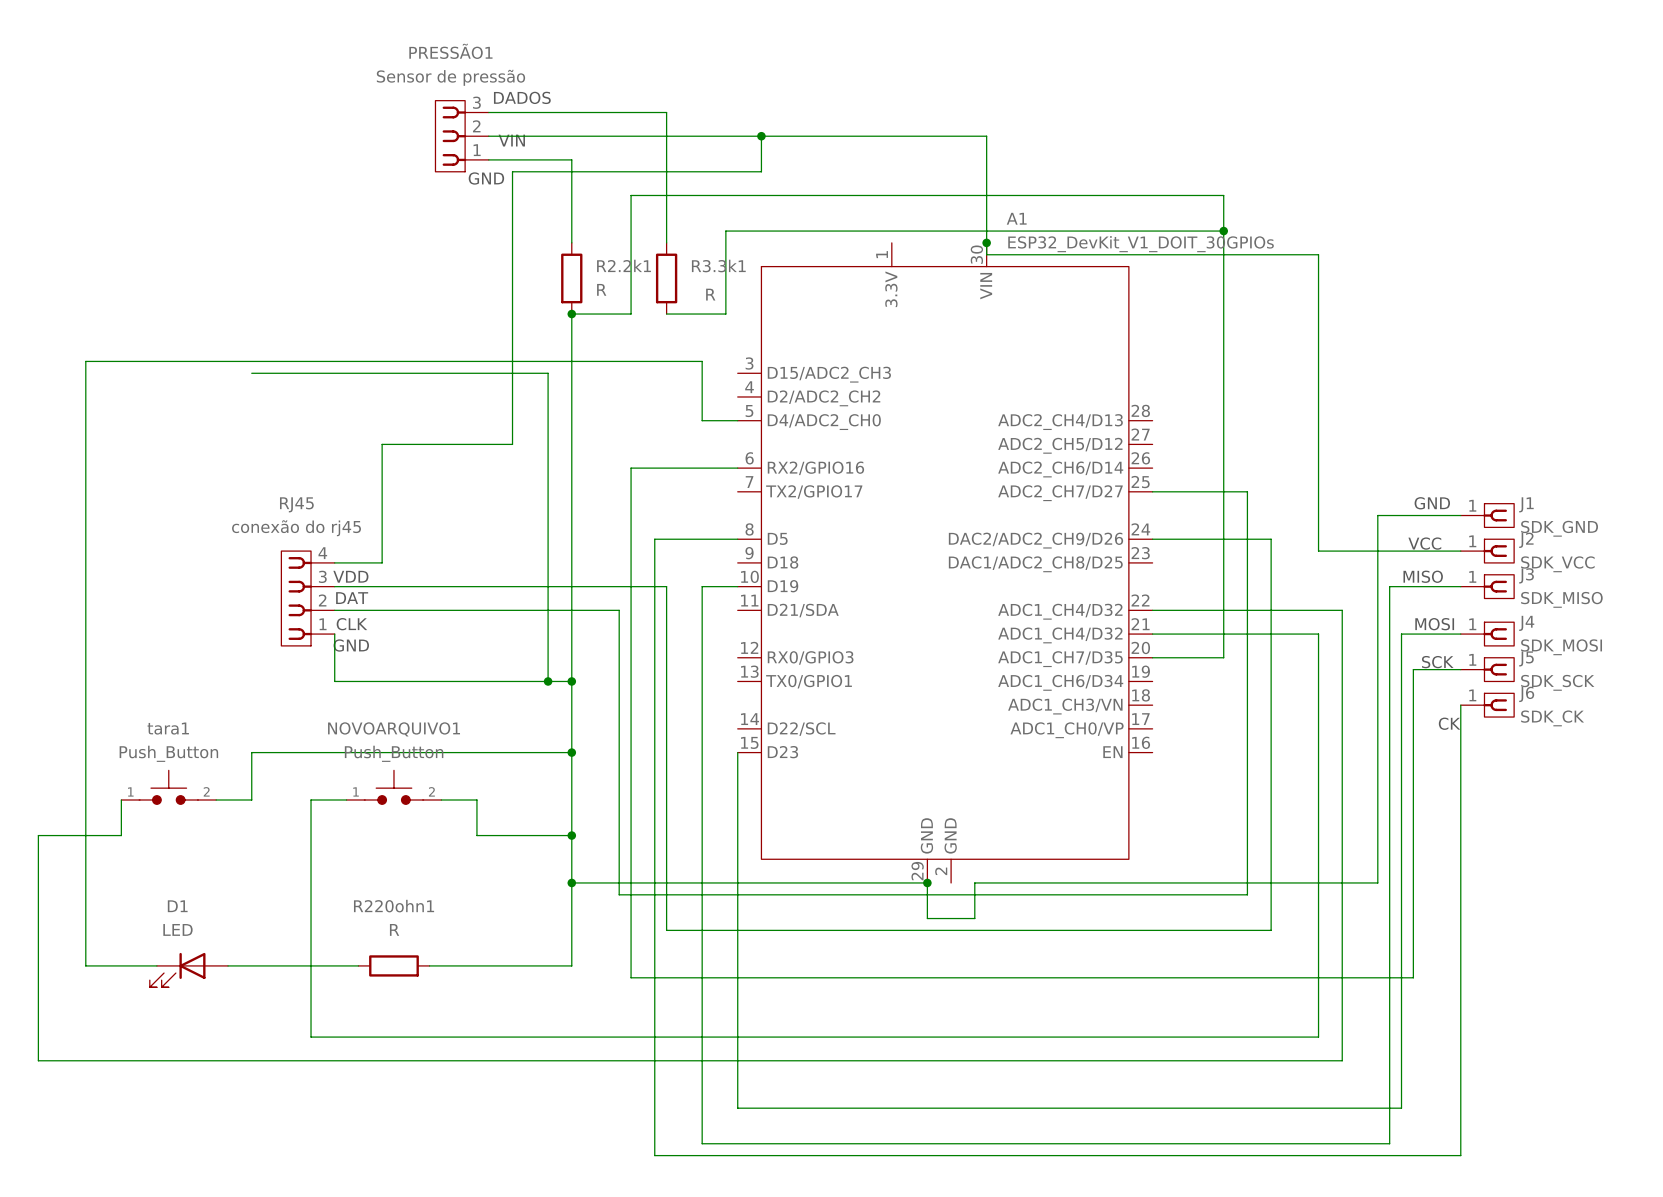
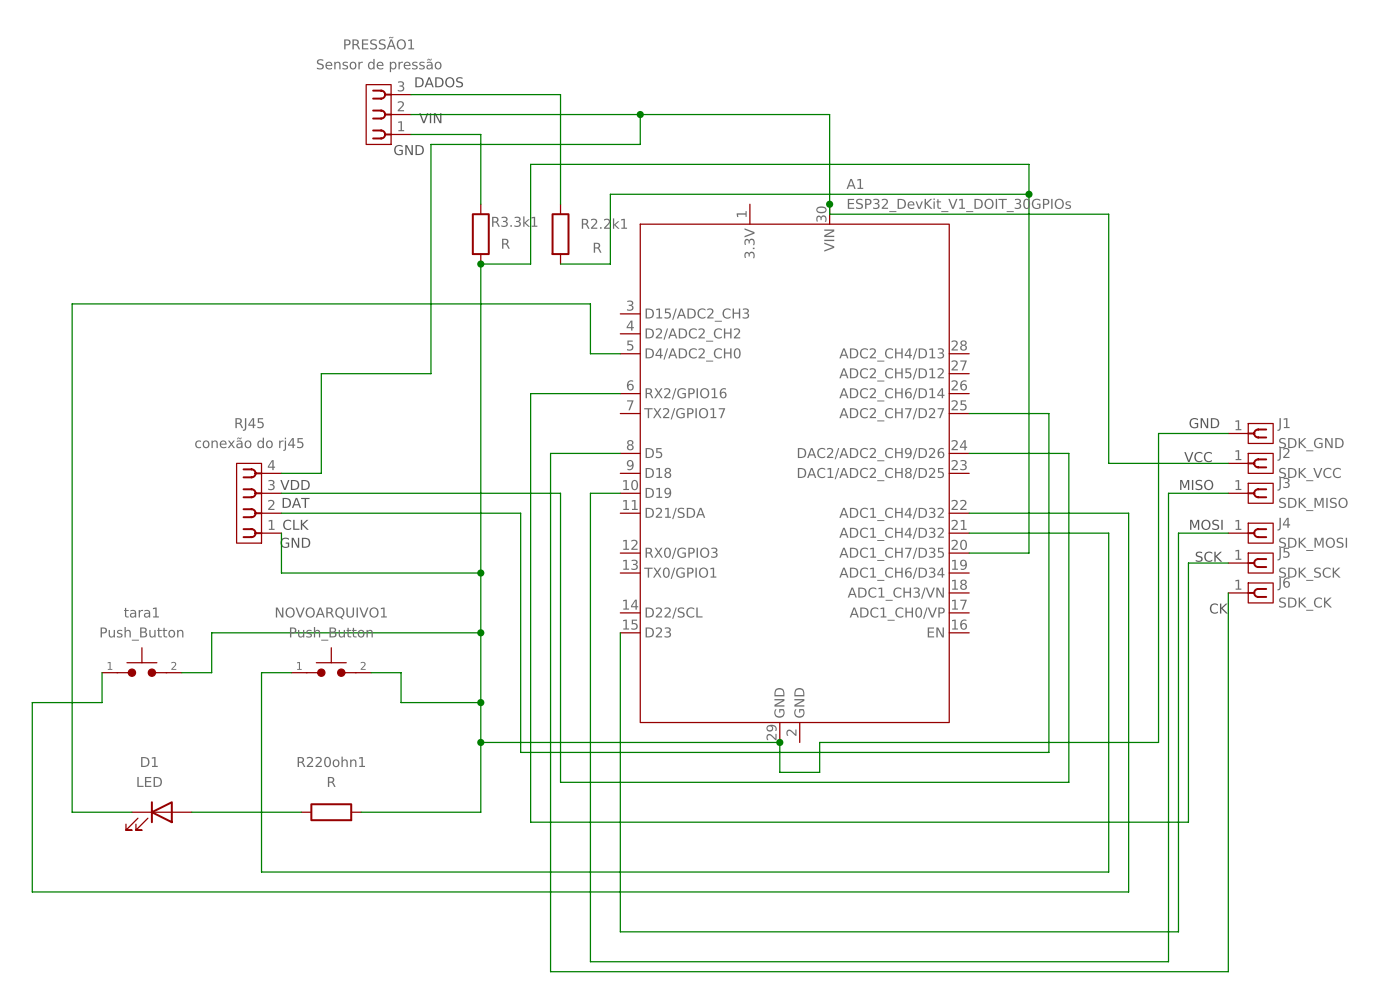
R2.2k1 name: R2.2k1 (623, 265) -> R3.3k1 (514, 221)
R3.3k1 name: R3.3k1 (718, 266) -> R2.2k1 (604, 223)
wire: (251, 373) (548, 373) (548, 681) -> none
junction: (548, 681) -> none

